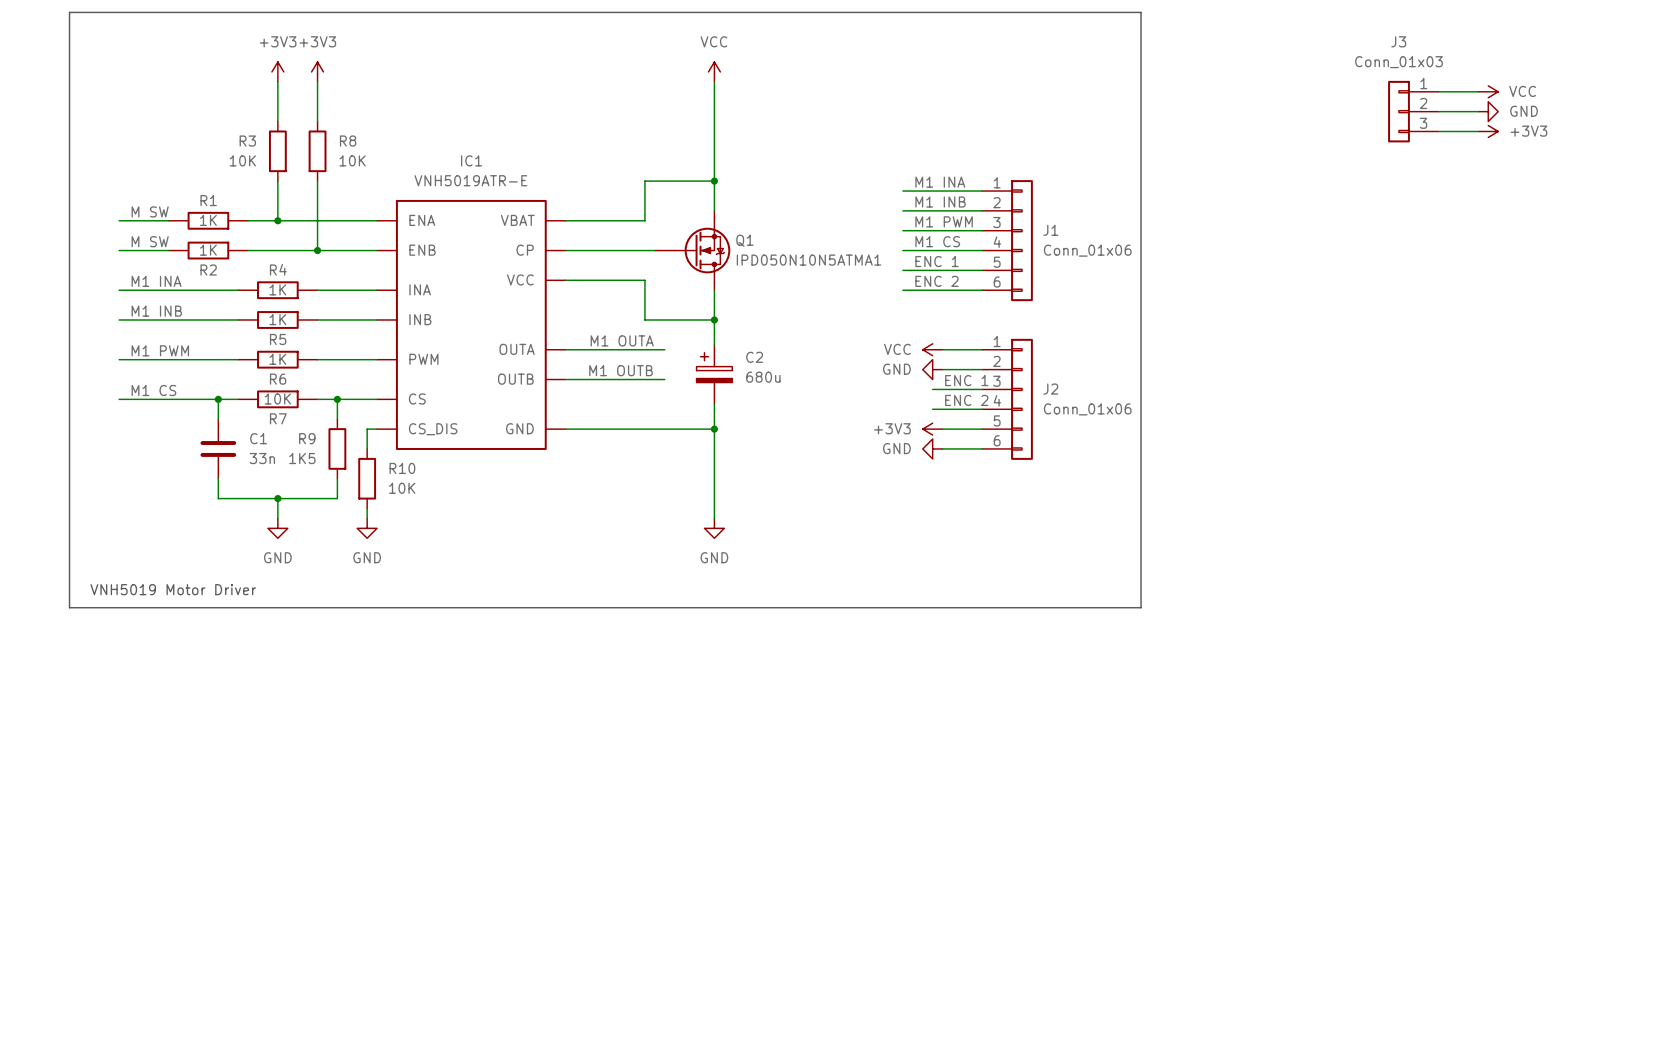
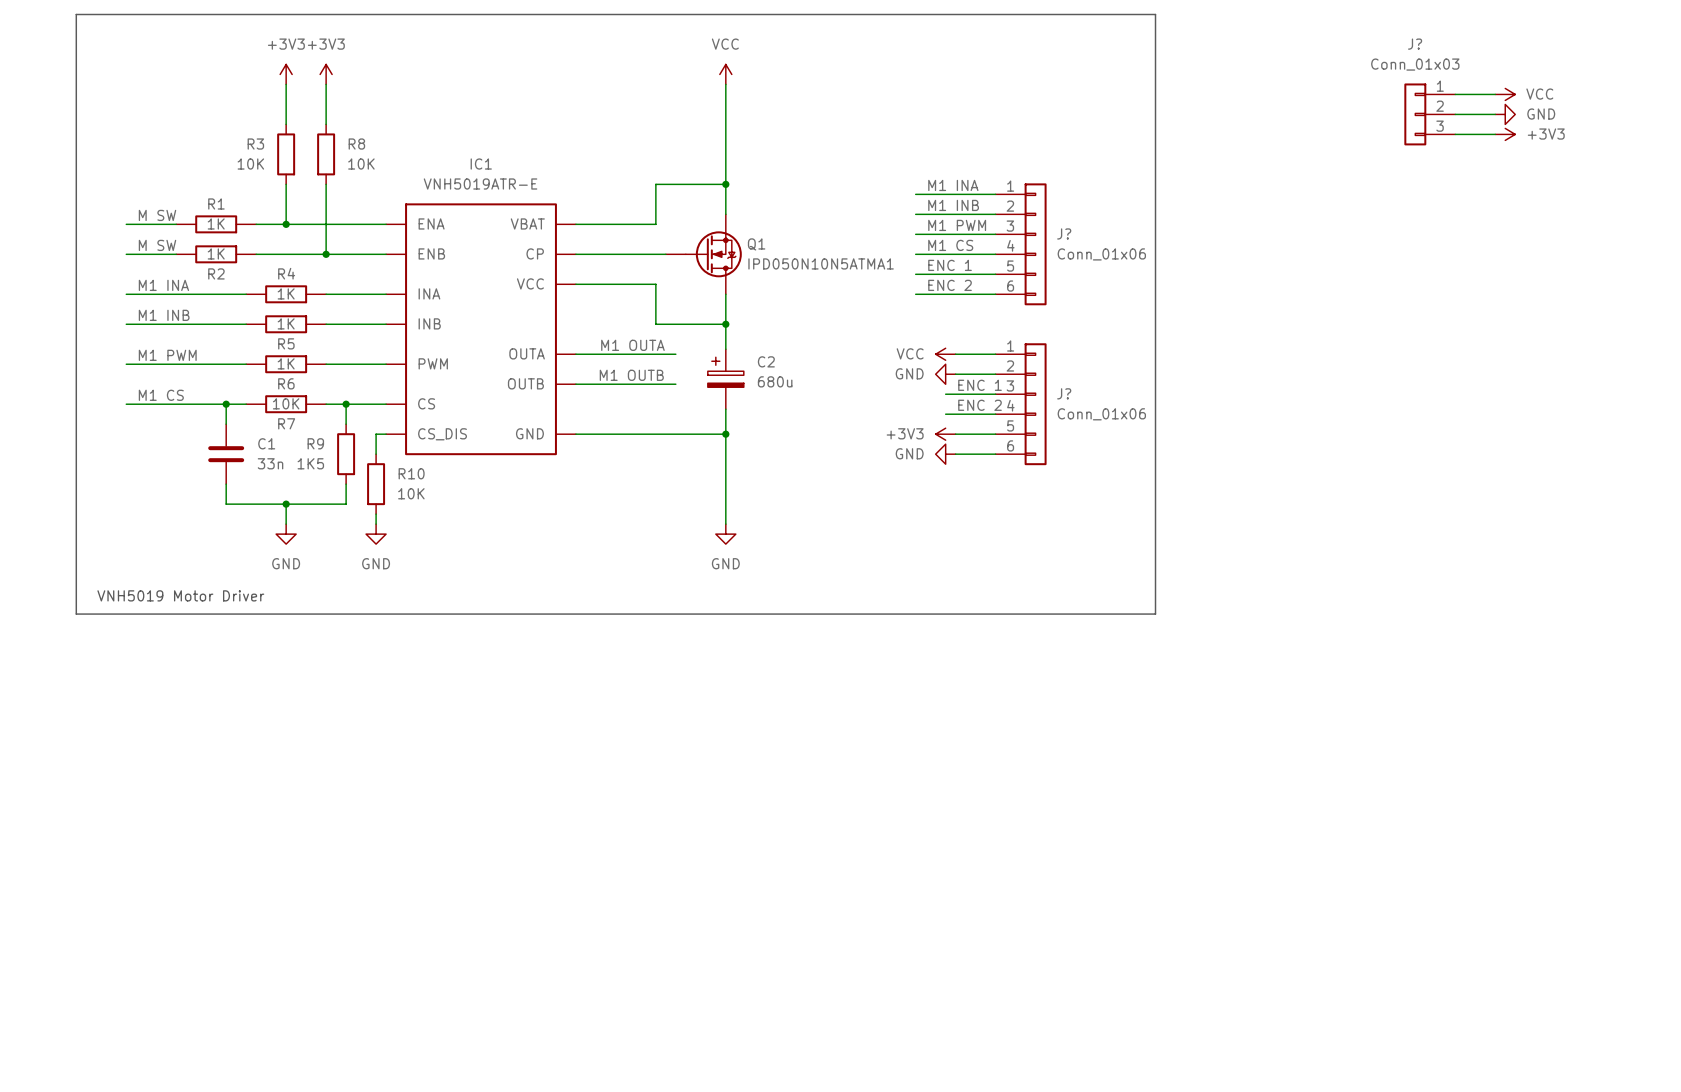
J3 name: J3 (1398, 41) -> J? (1415, 44)
J1 name: J1 (1050, 230) -> J? (1064, 233)
J2 name: J2 (1050, 389) -> J? (1064, 393)

